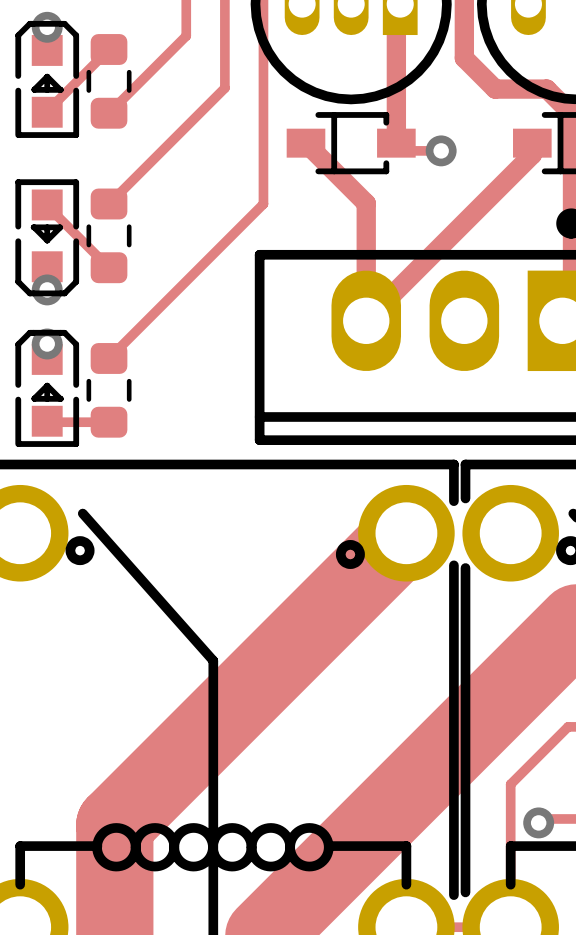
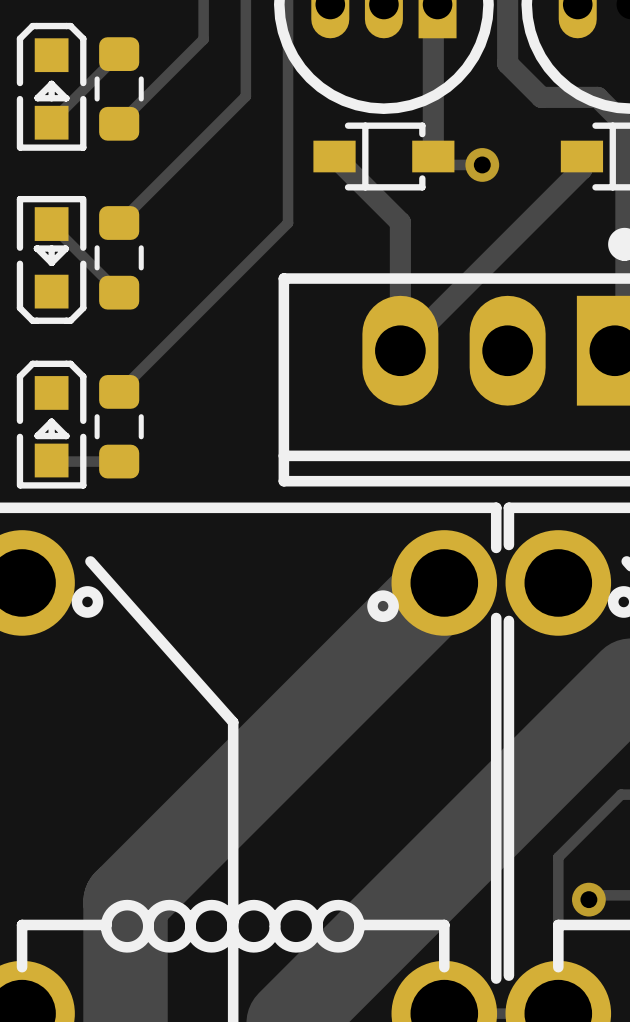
via: (47, 27) -> none
via: (47, 289) -> none
via: (47, 343) -> none

